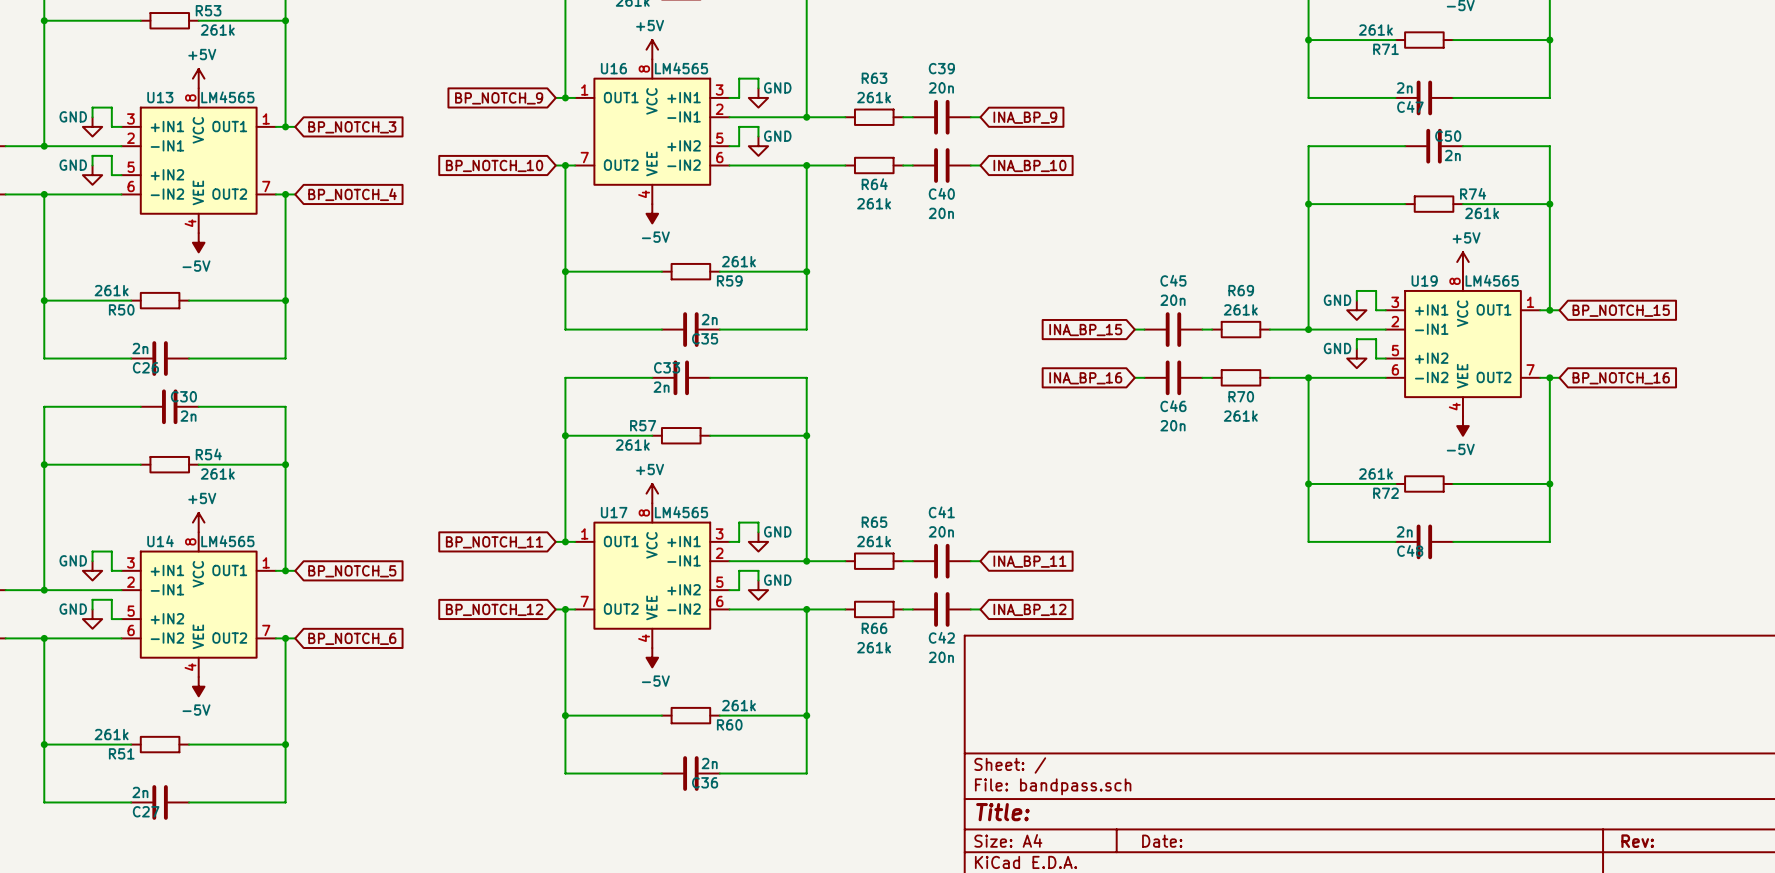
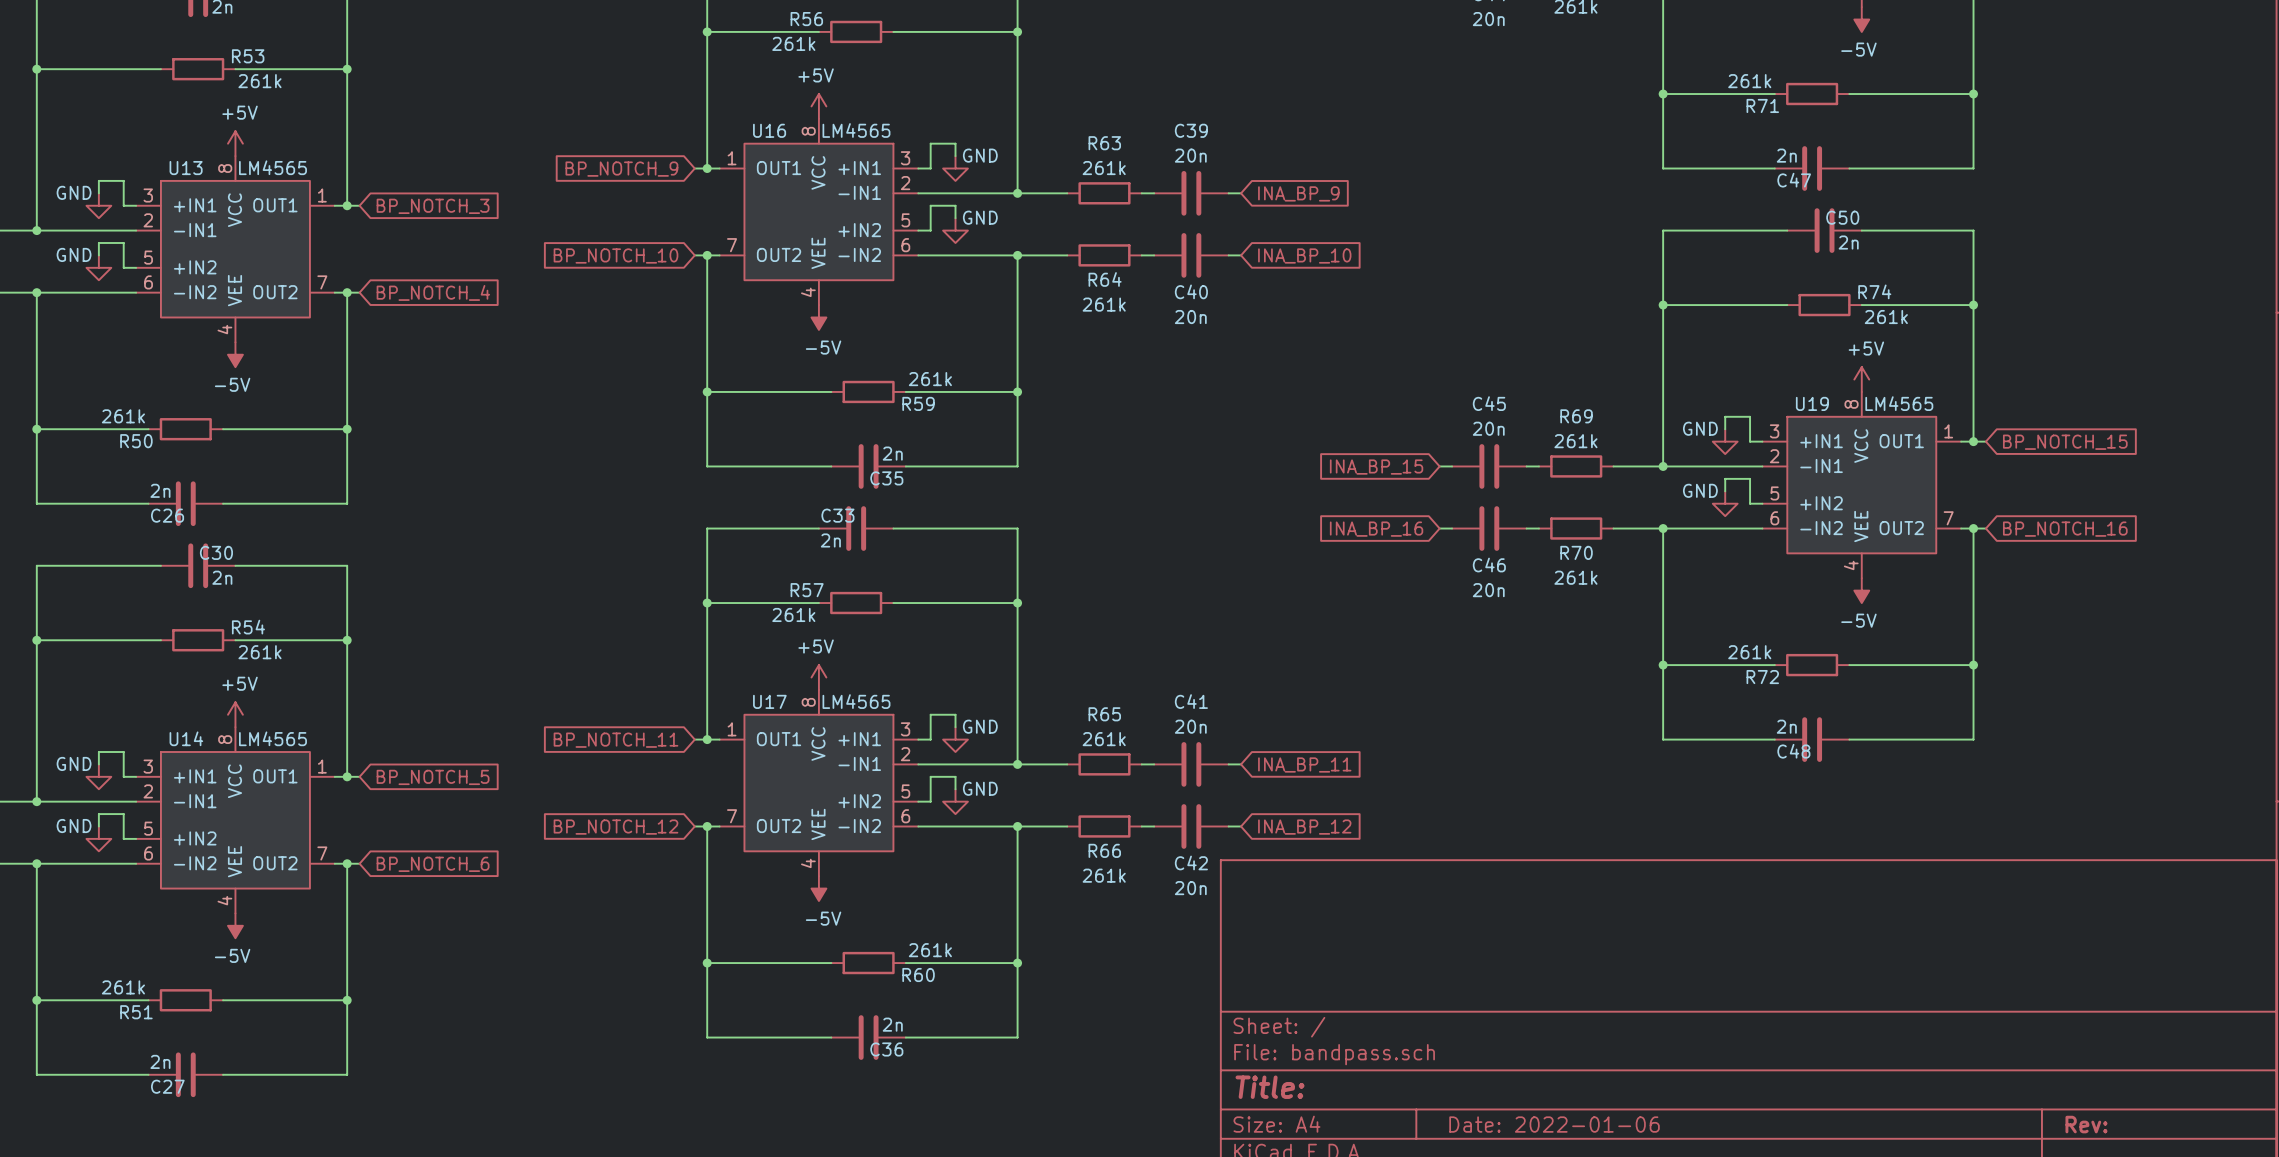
title block: Date: (1162, 841) -> Date: 2022-01-06 (1554, 1124)

